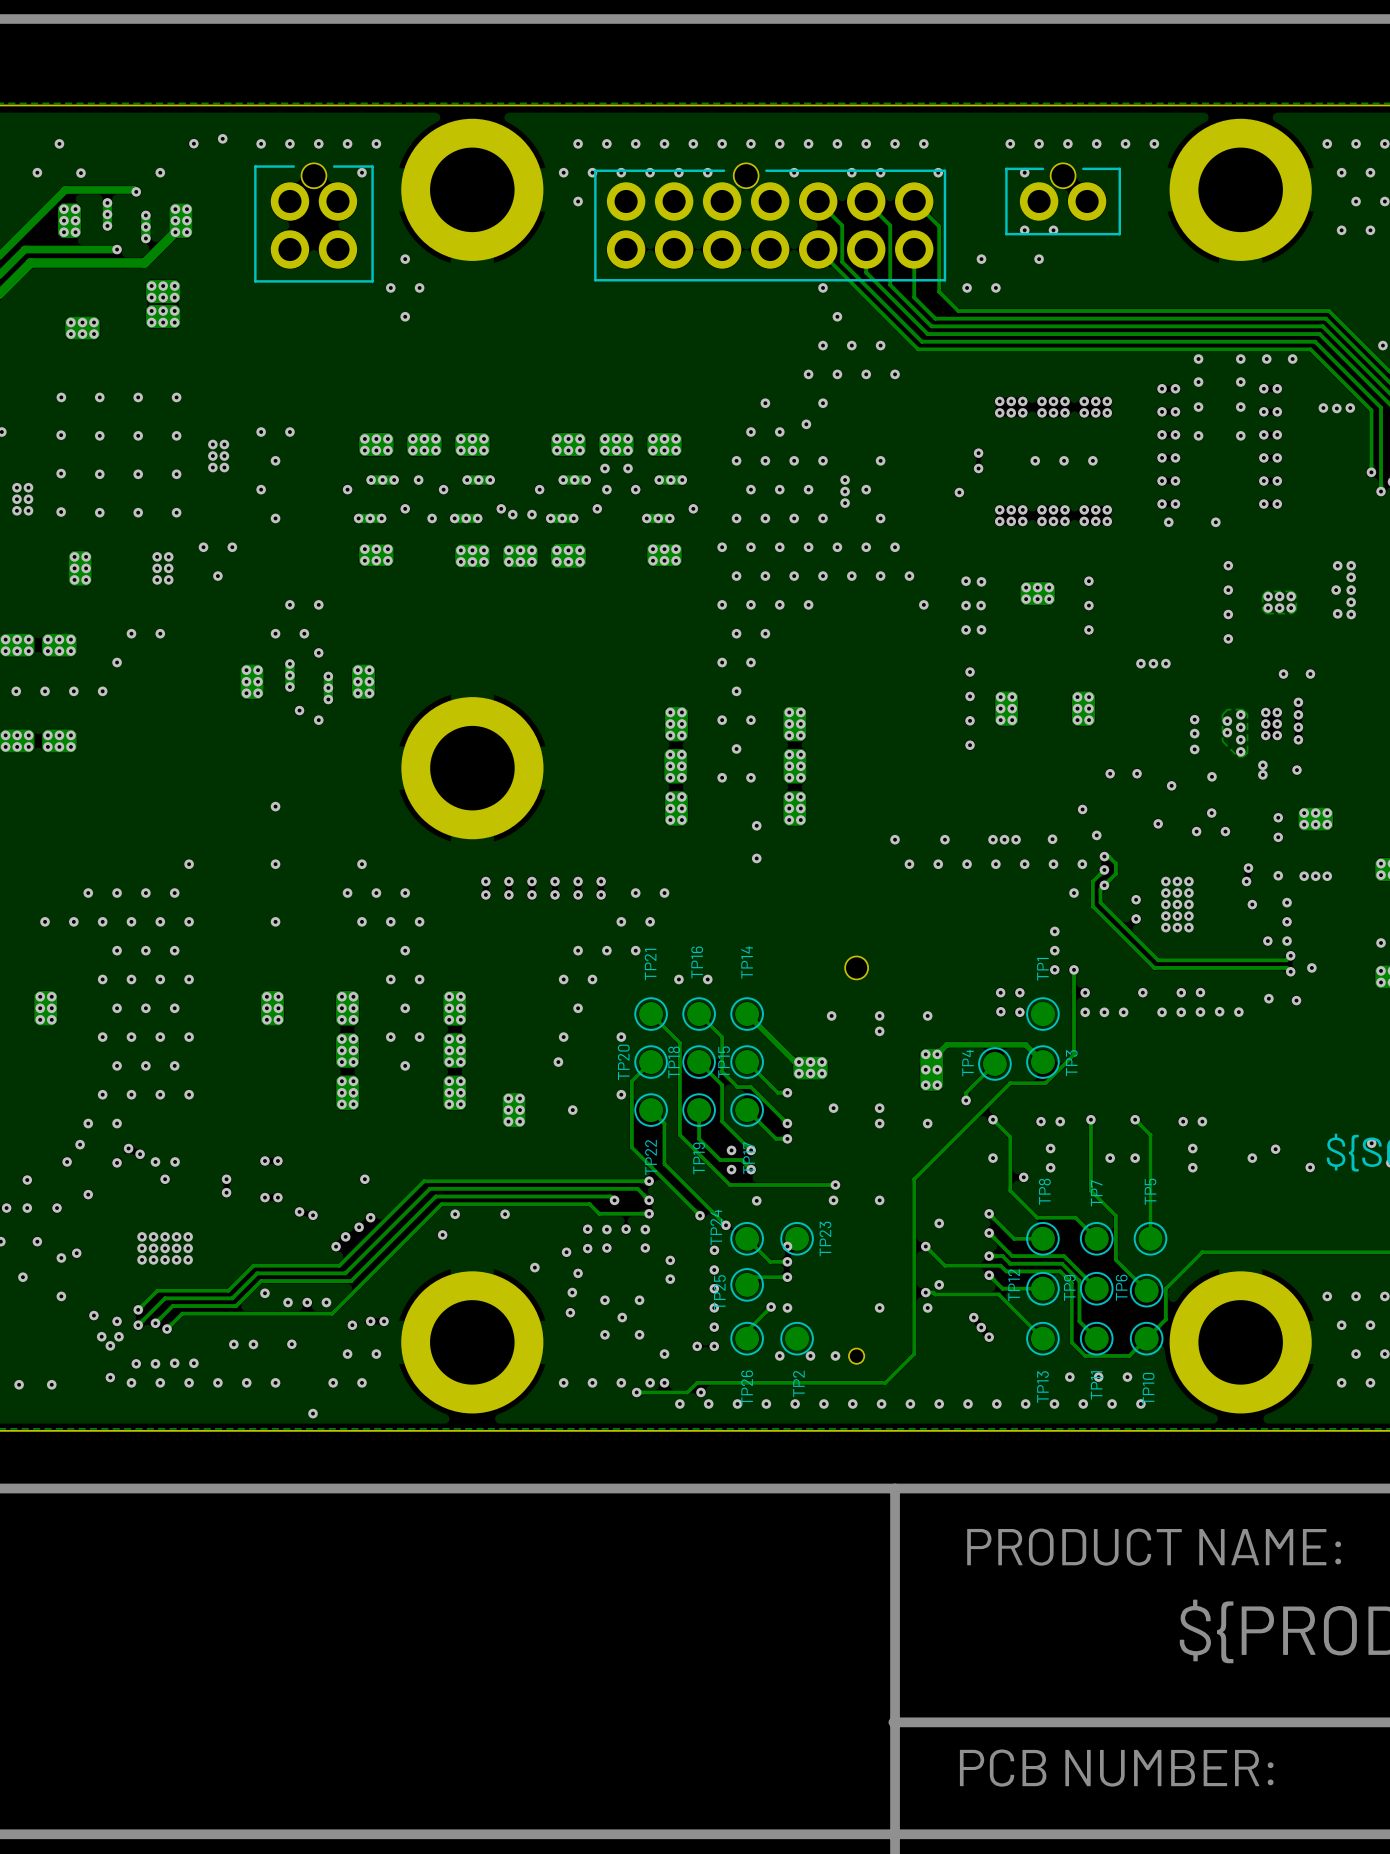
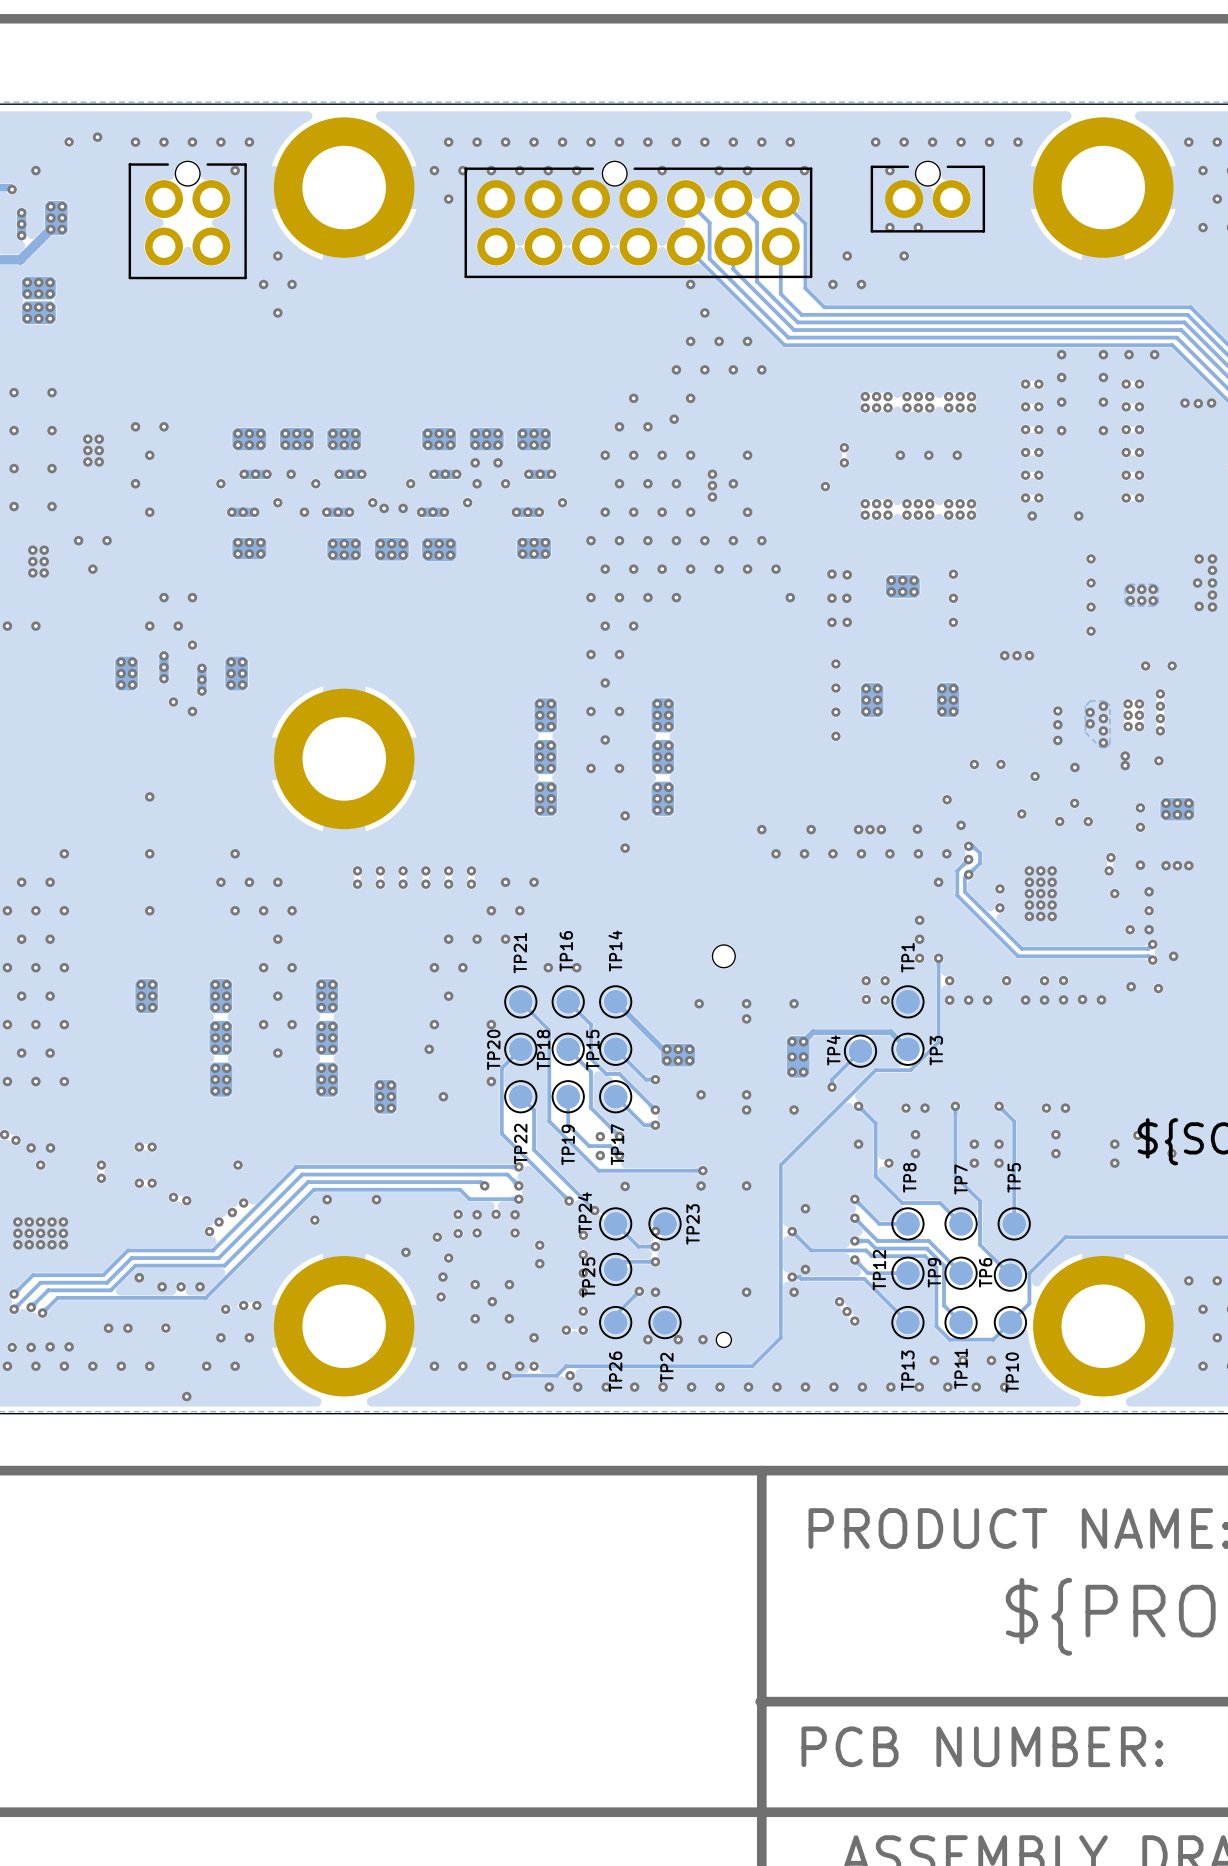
via: none -> (974, 1163)
via: none -> (999, 1163)
via: none -> (1114, 1163)

